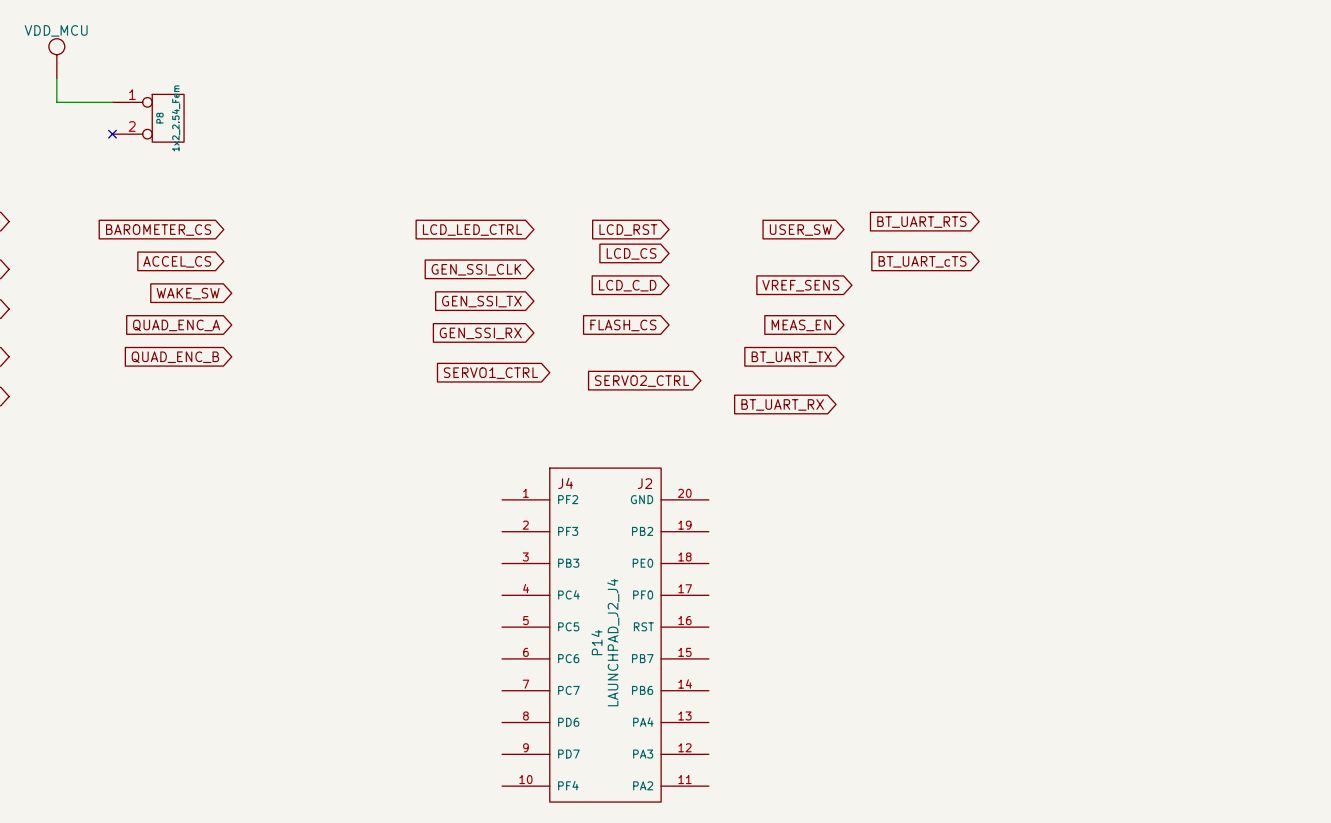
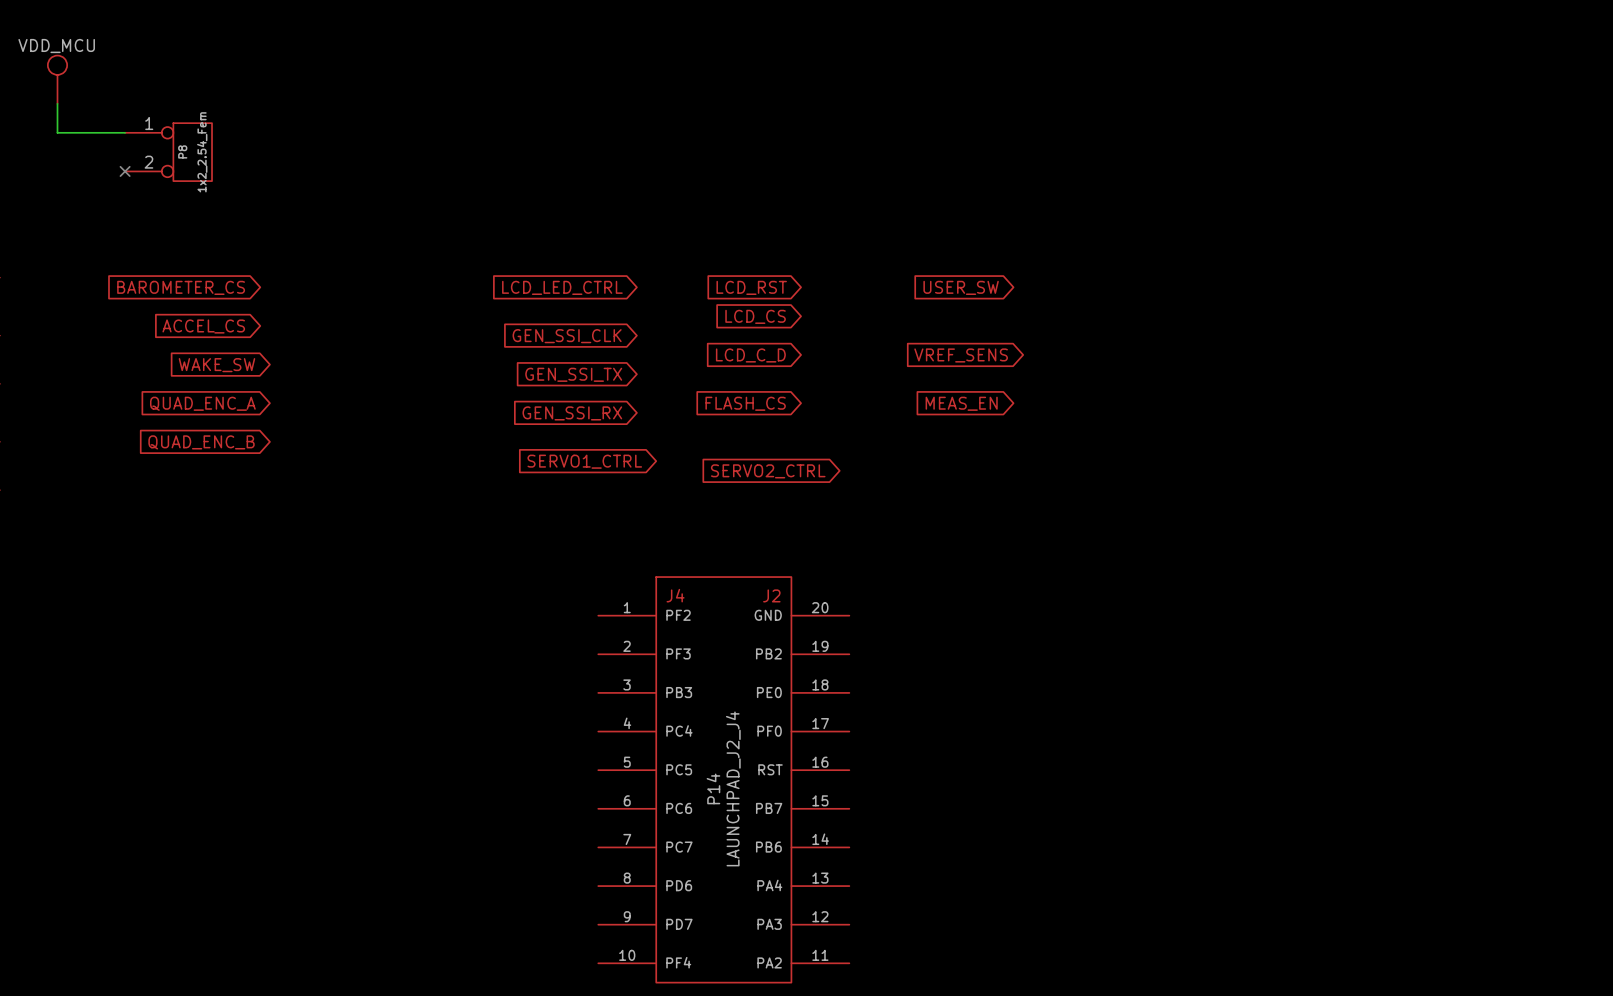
global label: BT_UART_RTS (921, 222) -> none
global label: BT_UART_cTS (922, 261) -> none
global label: BT_UART_TX (791, 357) -> none
global label: BT_UART_RX (782, 404) -> none

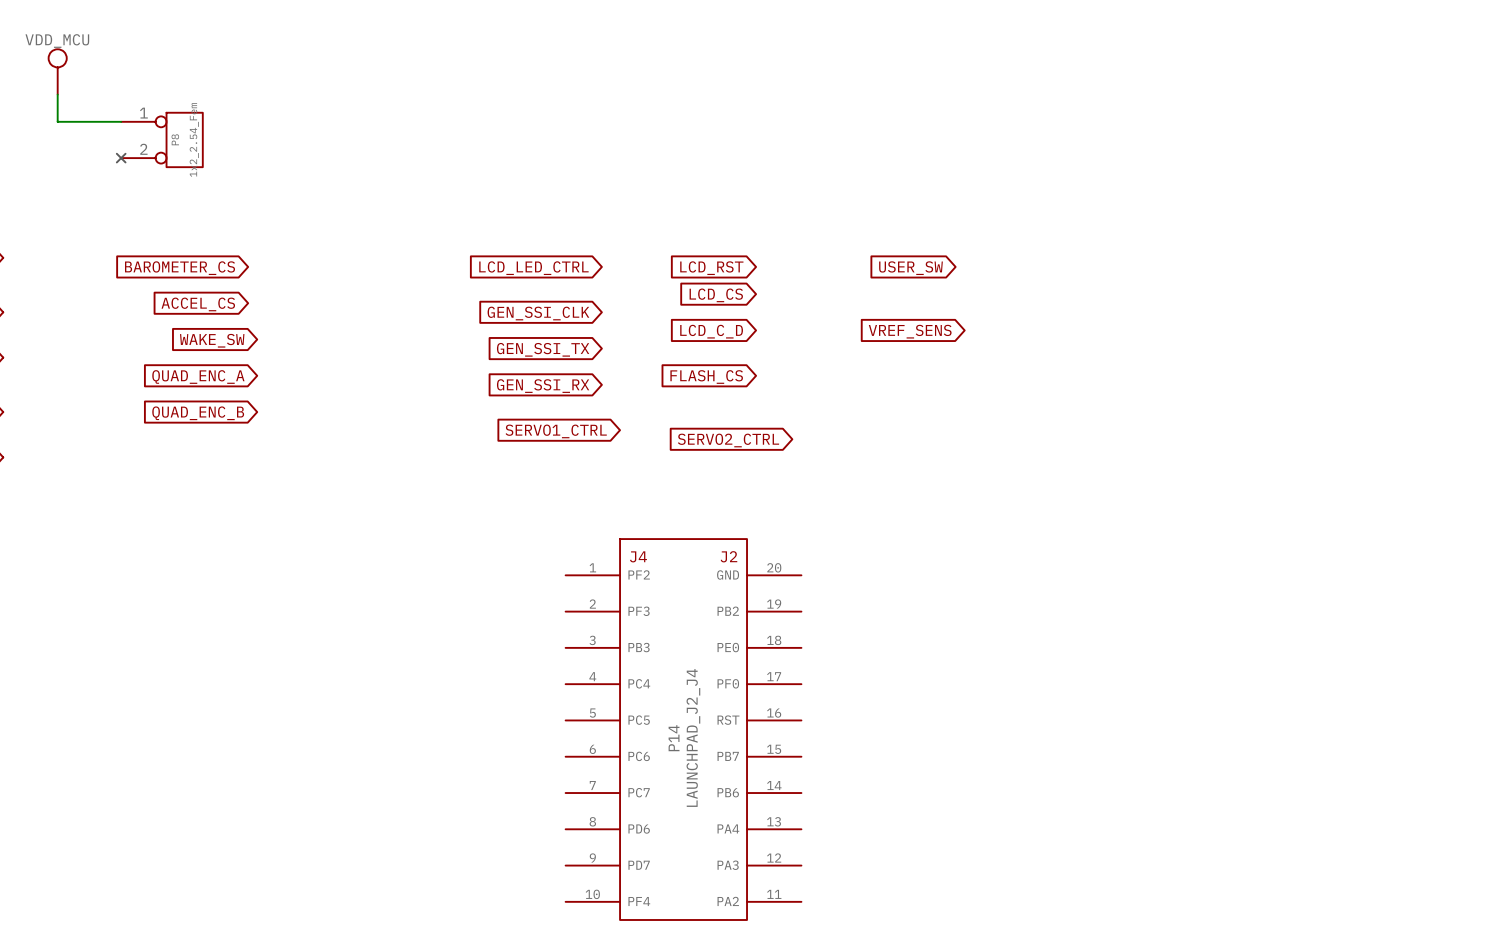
global label: MEAS_EN (961, 403) -> none

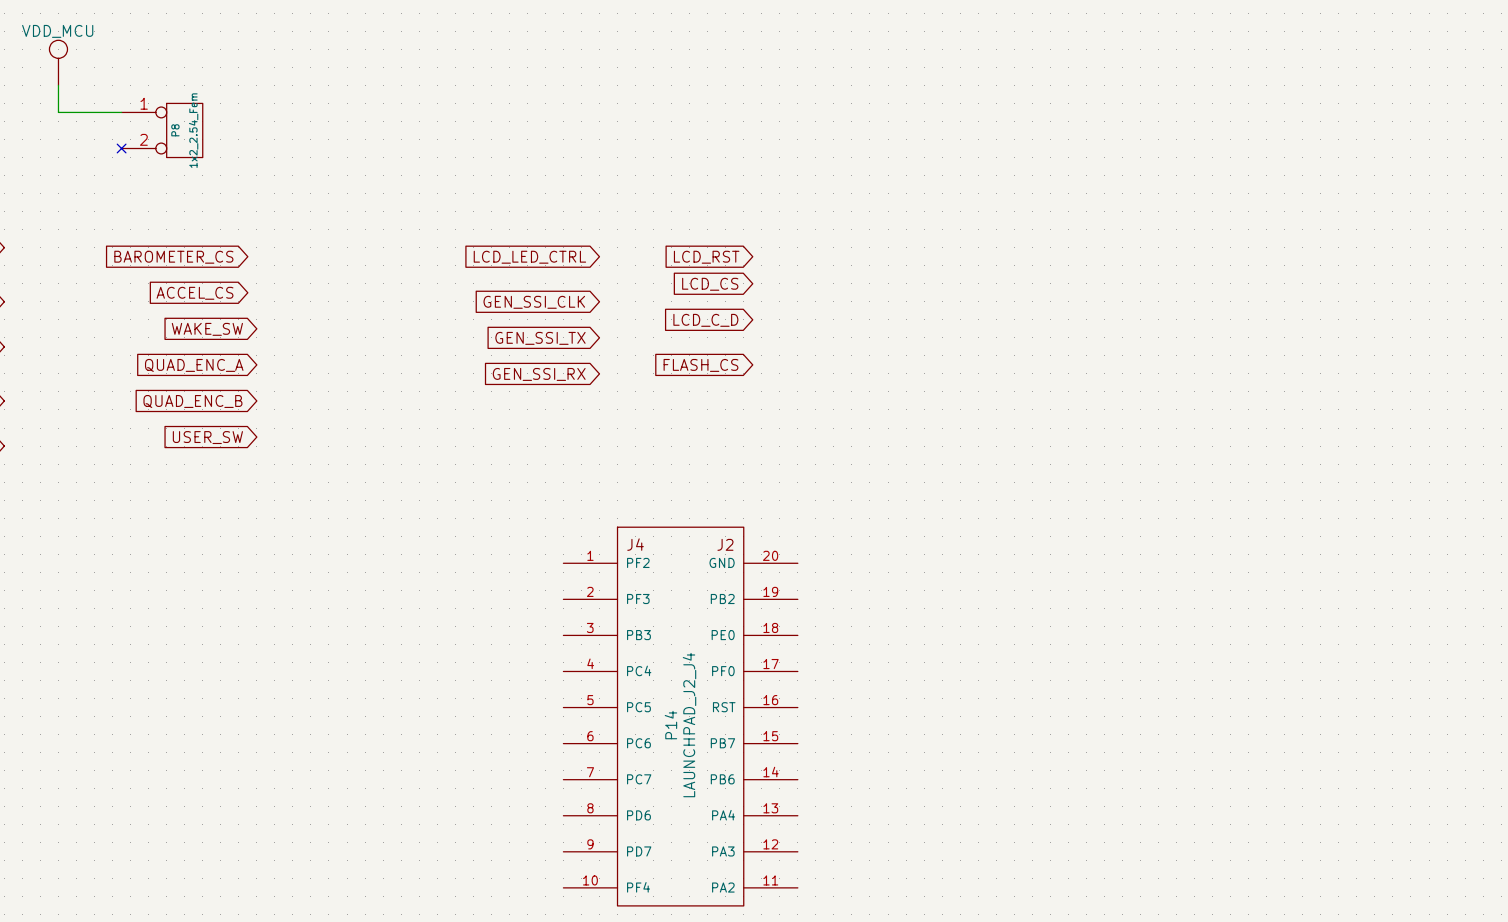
global label: USER_SW (910, 268) -> none
global label: VREF_SENS (910, 331) -> none
global label: SERVO1_CTRL (556, 431) -> none
global label: SERVO2_CTRL (728, 440) -> none
global label: none -> USER_SW (207, 437)

